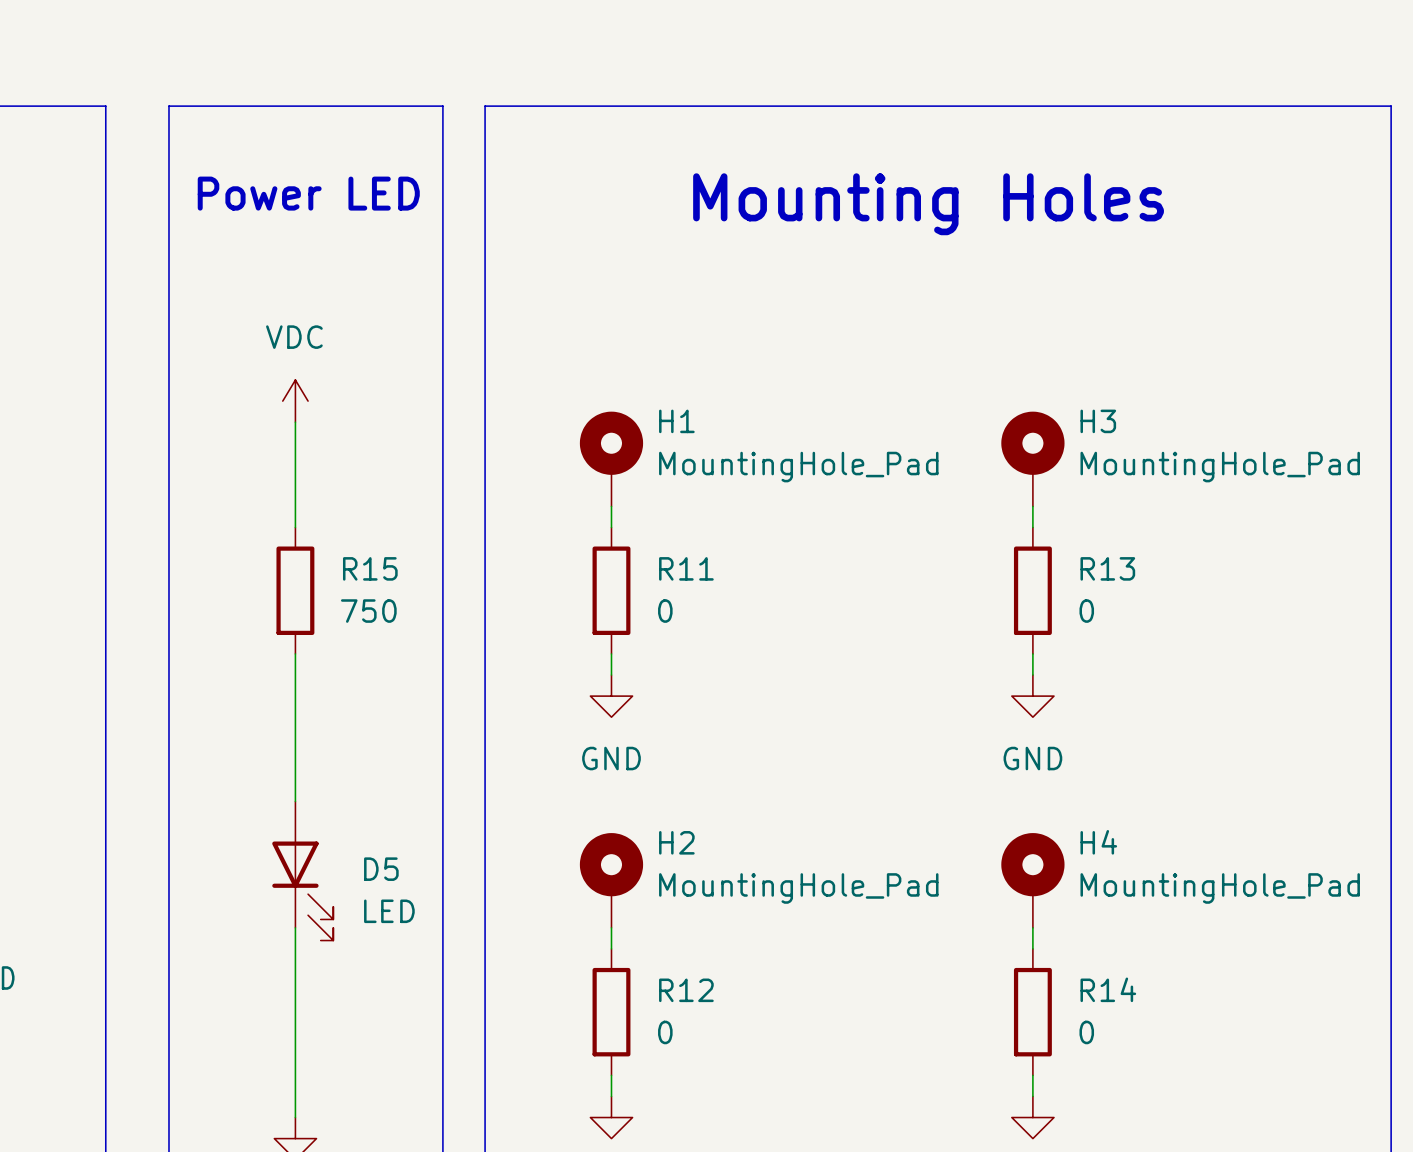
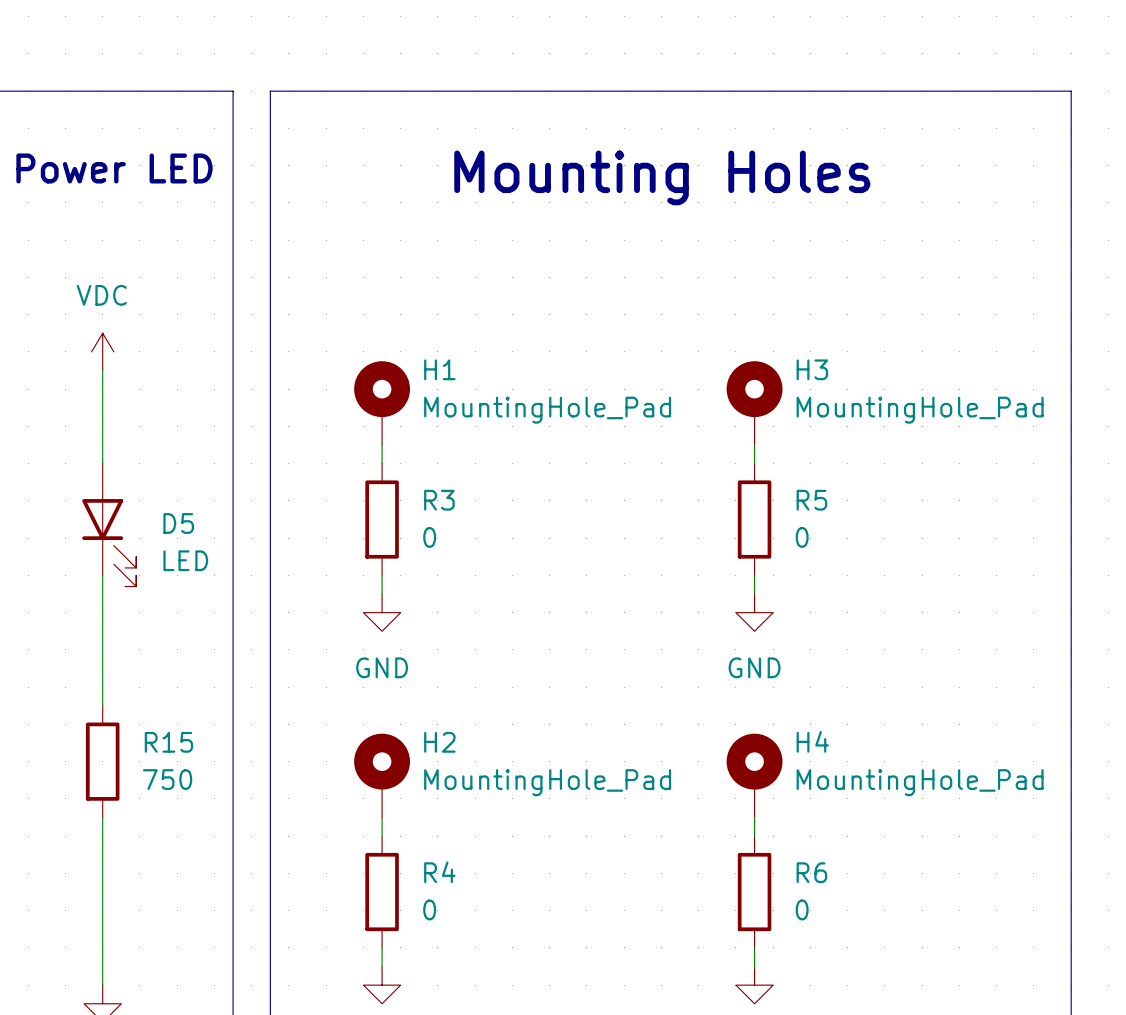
R11 name: R11 (686, 568) -> R3 (439, 500)
R13 name: R13 (1107, 568) -> R5 (811, 500)
R15 position: (295, 590) -> (102, 761)
D5 position: (302, 871) -> (109, 525)
R14 name: R14 (1108, 989) -> R6 (811, 872)
R12 name: R12 (686, 990) -> R4 (439, 872)

